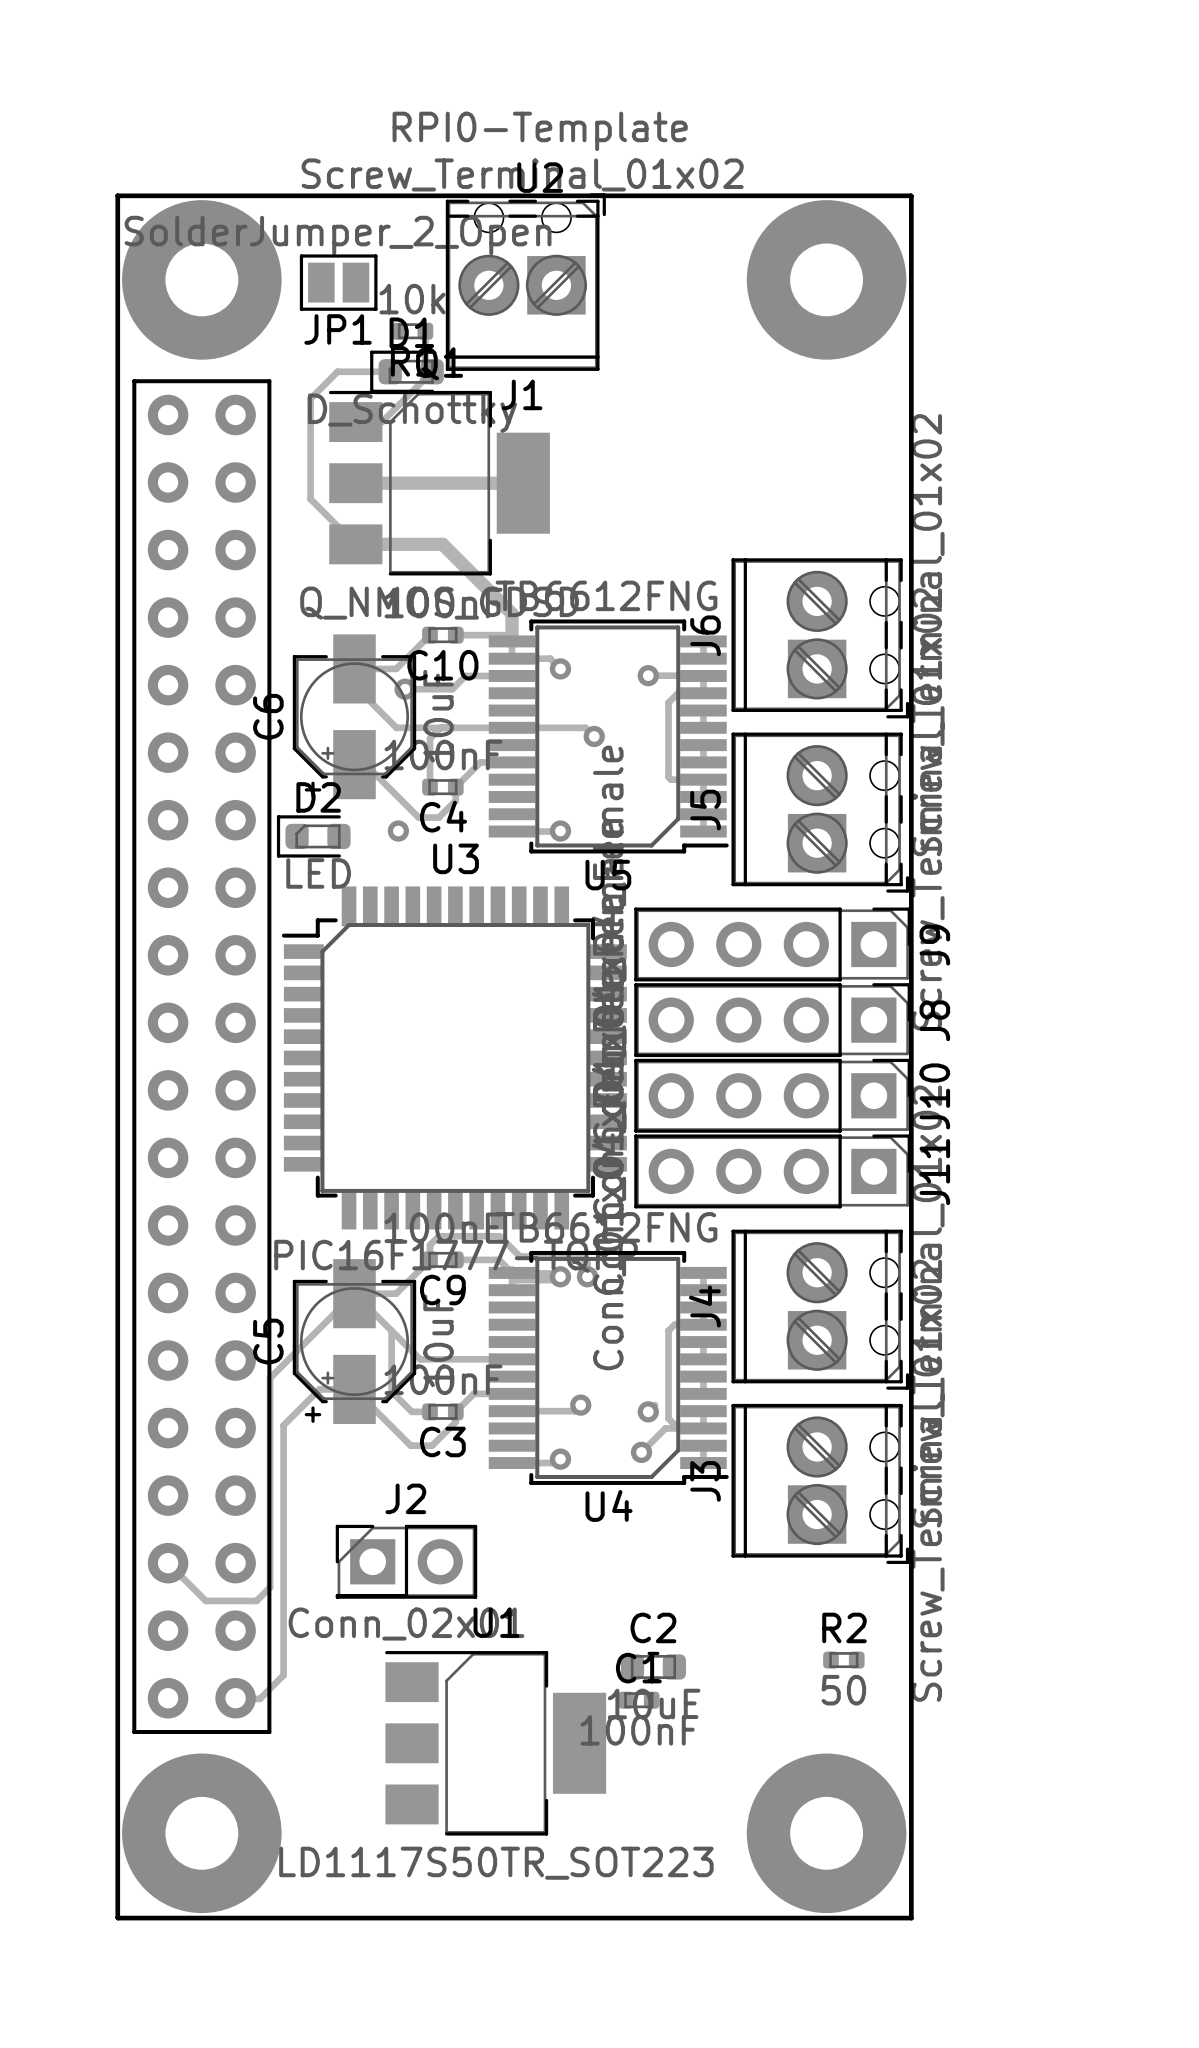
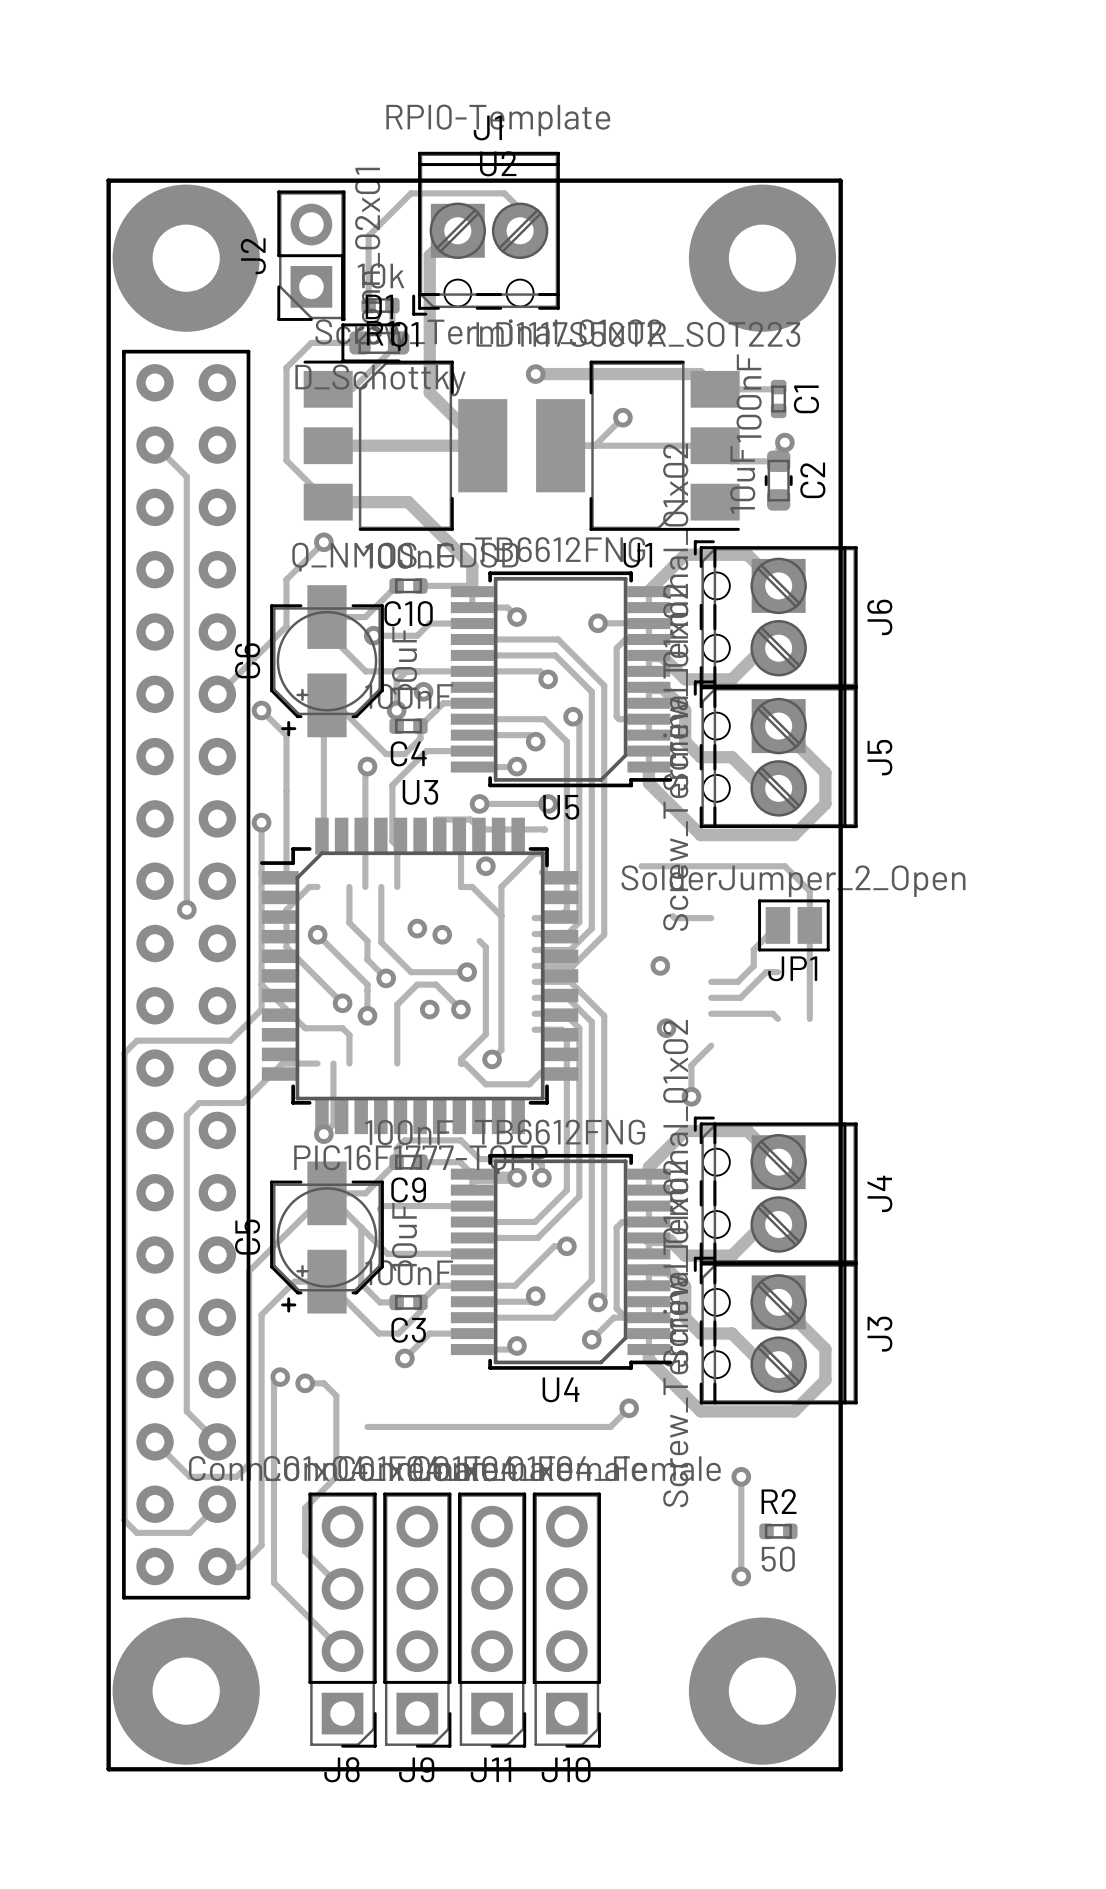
track: none -> (457, 224) (457, 227) (429, 255) (429, 392) (482, 445)
track: none -> (520, 230) (520, 208) (504, 193) (411, 193) (368, 235) (368, 305)
JP1 position: (338, 282) -> (793, 925)
J1 rotation: 0° (525, 282) -> 180° (486, 233)
track: none -> (535, 374) (699, 374) (715, 389) (776, 389) (778, 387)
via: none -> (535, 374)
track: none -> (622, 417) (594, 445)
via: none -> (622, 417)
track: none -> (784, 442) (778, 448) (778, 461) (730, 461) (715, 445) (560, 445)
via: none -> (784, 442)
track: none -> (155, 445) (186, 476) (186, 909)
track: none -> (323, 542) (286, 579) (286, 626) (217, 694)
via: none -> (323, 542)
track: none -> (778, 585) (747, 554) (685, 554) (648, 591)
J6 rotation: 0° (820, 638) -> 180° (775, 614)
track: none -> (472, 639) (558, 639) (604, 685) (604, 934) (573, 965) (534, 965)
track: none -> (778, 648) (763, 648) (731, 679) (685, 679) (661, 656) (648, 656)
track: none -> (472, 655) (555, 655) (591, 691) (591, 928) (570, 949) (534, 949)
track: none -> (648, 687) (662, 687) (685, 710) (685, 741) (700, 757) (731, 757) (763, 788) (778, 788)
via: none -> (423, 691)
track: none -> (326, 705) (323, 708) (323, 841)
track: none -> (261, 710) (286, 735) (286, 878)
via: none -> (261, 710)
via: none -> (396, 710)
via: none -> (573, 716)
track: none -> (579, 716) (579, 922) (567, 934) (534, 934)
track: none -> (472, 719) (544, 719) (566, 741) (566, 909) (558, 918) (534, 918)
track: none -> (778, 726) (825, 772) (825, 803) (794, 835) (700, 835) (648, 783) (648, 767)
track: none -> (472, 735) (529, 735) (535, 741)
via: none -> (535, 741)
J5 rotation: 0° (820, 812) -> 180° (775, 754)
track: none -> (472, 751) (426, 751) (392, 785) (392, 841) (397, 846) (397, 886)
track: none -> (365, 768) (365, 886)
D2: LED (313, 836) -> none
track: none -> (479, 803) (548, 803)
via: none -> (479, 803)
via: none -> (548, 803)
track: none -> (436, 819) (470, 819) (480, 829) (545, 830)
track: none -> (261, 822) (261, 1009) (230, 1040) (136, 1040) (124, 1053) (124, 1520) (136, 1532) (189, 1532) (217, 1504)
via: none -> (261, 822)
track: none -> (461, 841) (461, 886) (472, 886) (501, 916)
via: none -> (485, 866)
track: none -> (641, 866) (784, 866) (809, 891) (809, 1018)
J9 rotation: 0° (772, 944) -> 90° clockwise (417, 1620)
J9 position: (772, 944) -> (417, 1620)
track: none -> (541, 872) (545, 869) (545, 853) (534, 853) (501, 886) (501, 1050) (492, 1059)
track: none -> (317, 886) (309, 886) (286, 909) (286, 947) (342, 1003)
track: none -> (349, 886) (349, 922) (367, 941) (367, 959) (386, 978)
track: none -> (381, 886) (381, 942) (411, 972) (467, 972)
via: none -> (186, 909)
track: none -> (672, 916) (674, 918) (711, 918)
track: none -> (777, 925) (753, 949) (753, 965) (737, 981) (711, 981)
via: none -> (417, 928)
track: none -> (317, 934) (367, 984) (367, 1015)
via: none -> (317, 934)
via: none -> (442, 934)
track: none -> (479, 941) (485, 947) (485, 1034) (461, 1059) (461, 1063) (465, 1063) (485, 1084) (529, 1084) (541, 1071)
J8 rotation: 0° (772, 1020) -> 90° clockwise (342, 1620)
J8 position: (772, 1020) -> (342, 1620)
via: none -> (660, 965)
via: none -> (467, 972)
track: none -> (777, 972) (766, 972) (740, 997) (711, 997)
via: none -> (386, 978)
track: none -> (534, 981) (570, 981) (604, 1015) (604, 1296)
track: none -> (261, 984) (305, 1028) (342, 1028) (349, 1035) (349, 1063)
track: none -> (534, 997) (567, 997) (591, 1022) (591, 1280) (554, 1317) (472, 1317)
via: none -> (342, 1003)
via: none -> (429, 1009)
track: none -> (460, 1009) (436, 984) (417, 984) (397, 1004) (397, 1063)
via: none -> (460, 1009)
J10 rotation: 0° (772, 1095) -> 90° clockwise (566, 1620)
J10 position: (772, 1095) -> (566, 1620)
track: none -> (534, 1013) (564, 1013) (579, 1028) (579, 1196) (537, 1237) (472, 1237)
track: none -> (711, 1013) (772, 1013) (777, 1018)
via: none -> (367, 1015)
via: none -> (666, 1028)
track: none -> (534, 1029) (562, 1029) (566, 1034) (566, 1190) (535, 1222) (472, 1222)
track: none -> (711, 1045) (691, 1065) (691, 1096)
via: none -> (492, 1059)
track: none -> (317, 1063) (282, 1063) (242, 1103) (199, 1103) (186, 1115) (186, 1411) (217, 1442)
track: none -> (333, 1063) (333, 1124) (323, 1134)
J11 rotation: 0° (772, 1171) -> 90° clockwise (492, 1620)
J11 position: (772, 1171) -> (492, 1620)
via: none -> (691, 1096)
via: none -> (323, 1134)
track: none -> (778, 1162) (747, 1131) (685, 1131) (648, 1167) (648, 1174)
track: none -> (472, 1206) (382, 1206) (379, 1208)
J4 rotation: 0° (820, 1309) -> 180° (775, 1190)
track: none -> (778, 1224) (763, 1224) (731, 1255) (685, 1255) (669, 1240) (648, 1240)
track: none -> (566, 1246) (554, 1246) (514, 1285) (472, 1285)
via: none -> (566, 1246)
track: none -> (648, 1270) (668, 1270) (685, 1286) (685, 1317) (700, 1333) (731, 1333) (763, 1364) (778, 1364)
track: none -> (778, 1302) (825, 1349) (825, 1380) (794, 1411) (700, 1411) (648, 1359) (648, 1349)
track: none -> (472, 1333) (429, 1333) (404, 1358)
via: none -> (404, 1358)
J3 rotation: 0° (820, 1483) -> 180° (775, 1330)
track: none -> (280, 1377) (274, 1383) (274, 1582) (342, 1651)
via: none -> (280, 1377)
track: none -> (305, 1383) (323, 1383) (336, 1395) (336, 1476) (305, 1507) (305, 1551) (342, 1588)
via: none -> (305, 1383)
track: none -> (629, 1408) (610, 1426) (367, 1426)
via: none -> (629, 1408)
J2 rotation: 0° (406, 1561) -> 90° counterclockwise (311, 255)
J2 position: (406, 1561) -> (311, 255)
track: none -> (741, 1476) (741, 1576)
via: none -> (741, 1476)
C2 rotation: 0° (653, 1666) -> 90° clockwise (778, 480)
C2 position: (653, 1666) -> (778, 480)
C1 rotation: 0° (638, 1700) -> 90° clockwise (778, 398)
C1 position: (638, 1700) -> (778, 398)
via: none -> (741, 1576)
U1 rotation: 0° (495, 1743) -> 180° (638, 445)
U1 position: (495, 1743) -> (638, 445)

